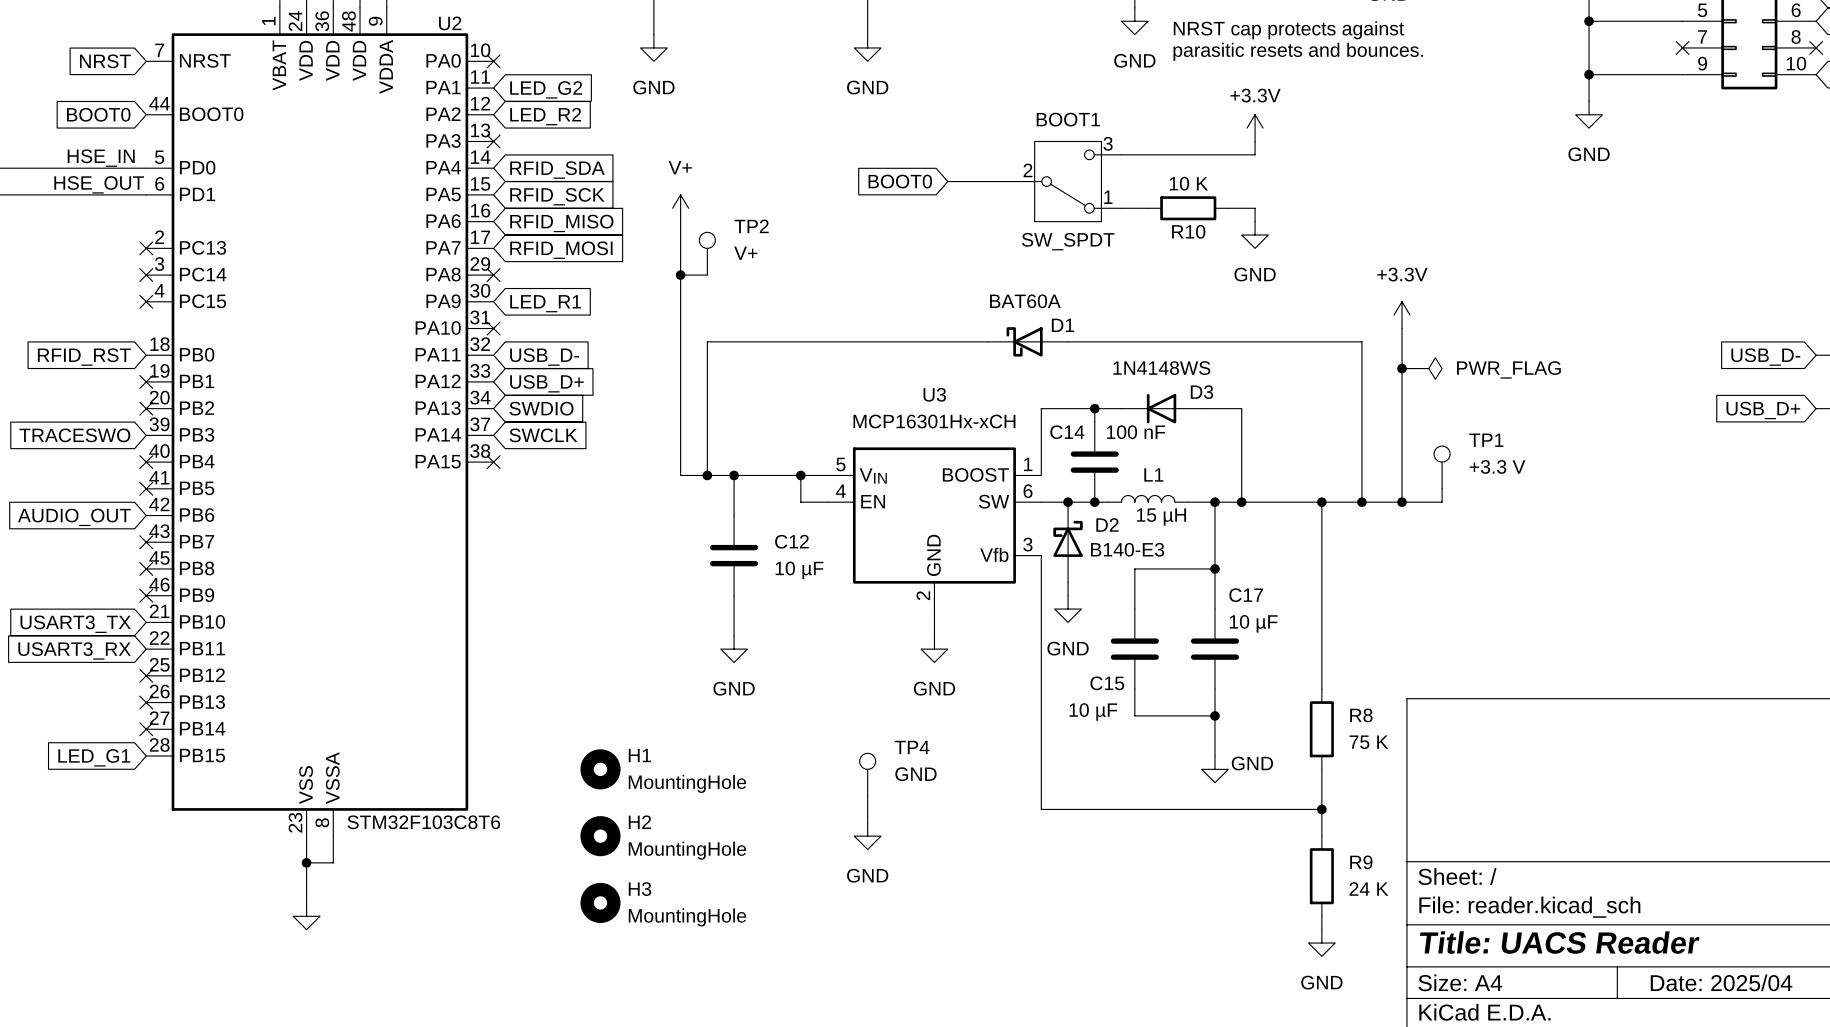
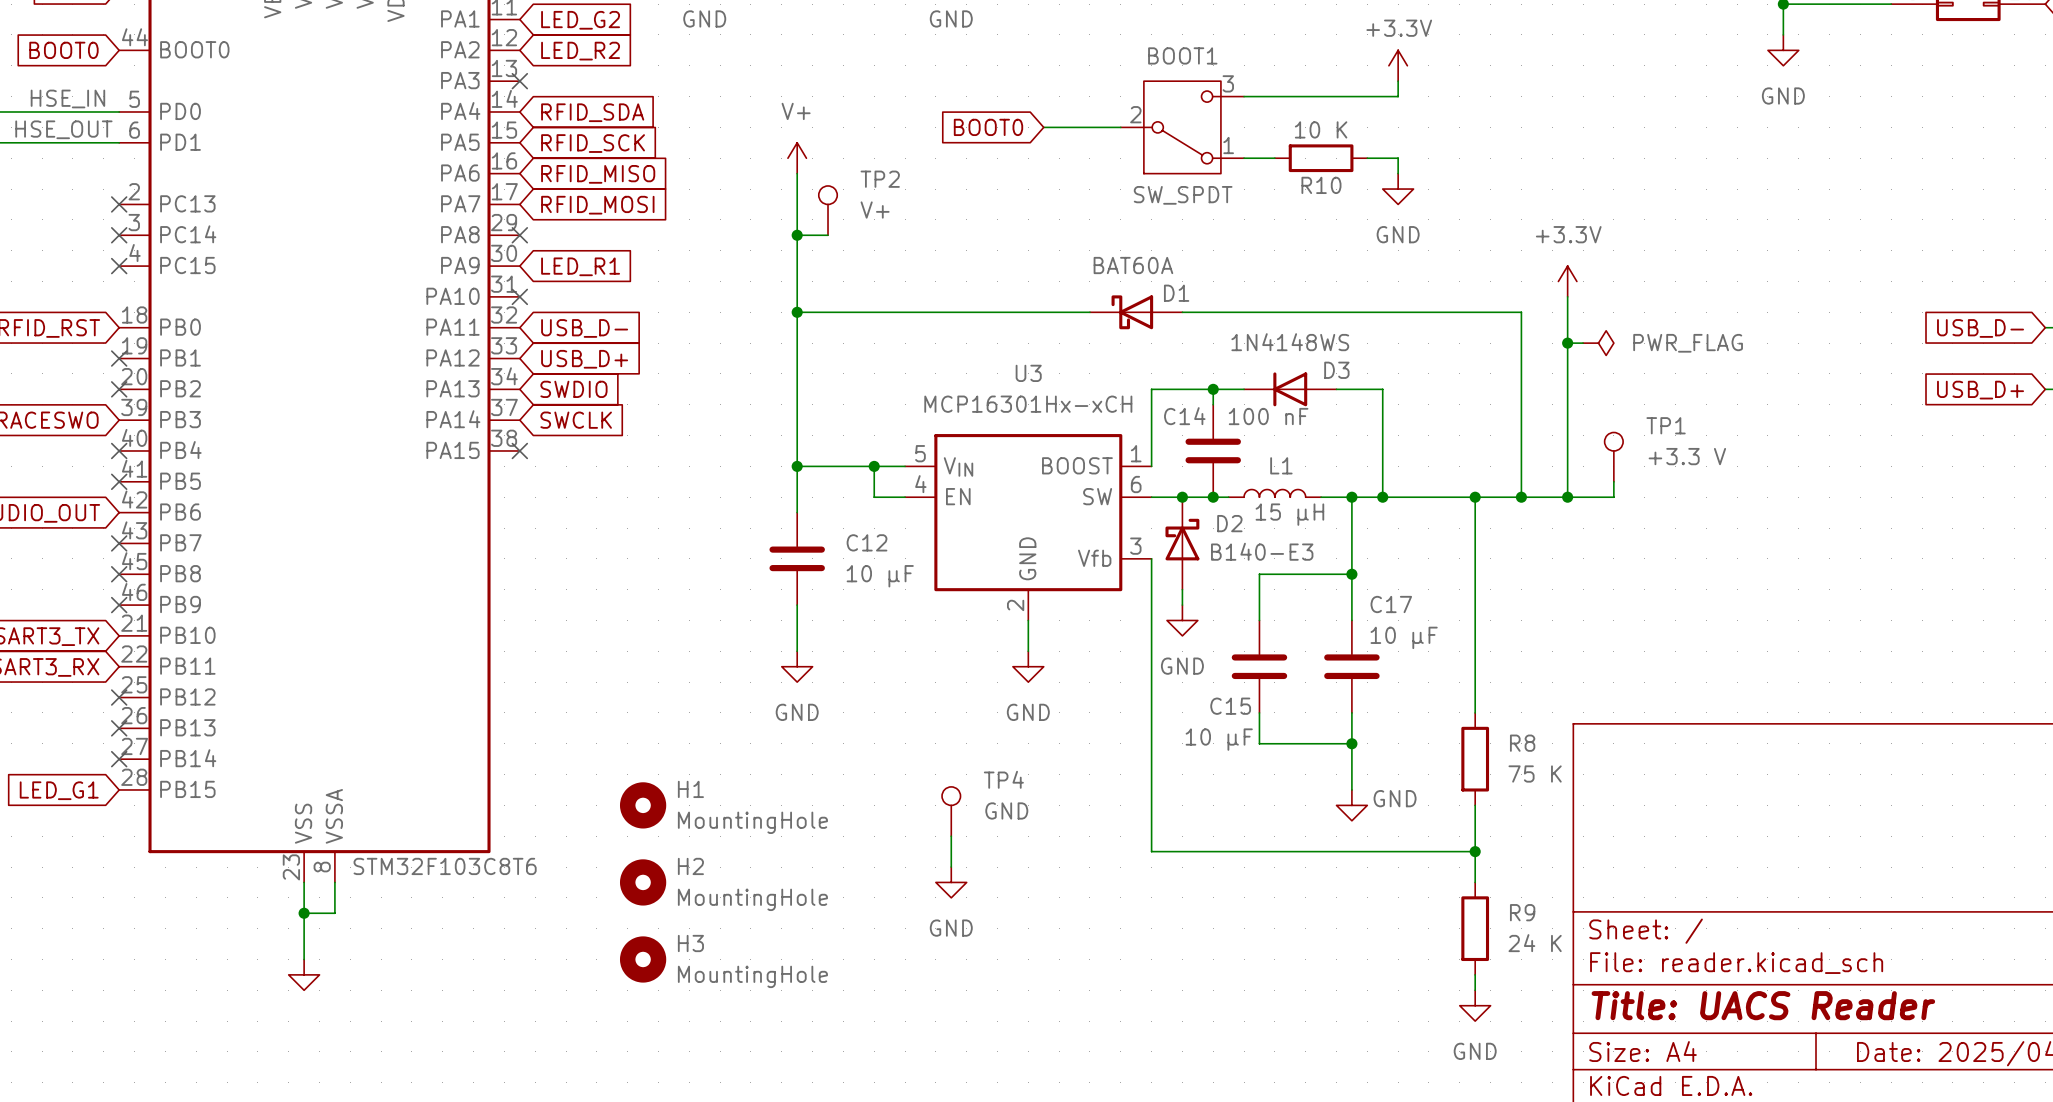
power symbol position: V+ (680, 208) -> V+ (797, 158)
wire: (680, 221) (680, 475) (734, 475) -> (797, 173) (797, 466)
TP2 position: (707, 253) -> (828, 210)
wire: (680, 275) (707, 275) -> (797, 235) (828, 235)
junction: (680, 275) -> none
junction: none -> (797, 235)
wire: (734, 341) (707, 341) (707, 475) -> none
junction: none -> (797, 312)
junction: (707, 475) -> none

